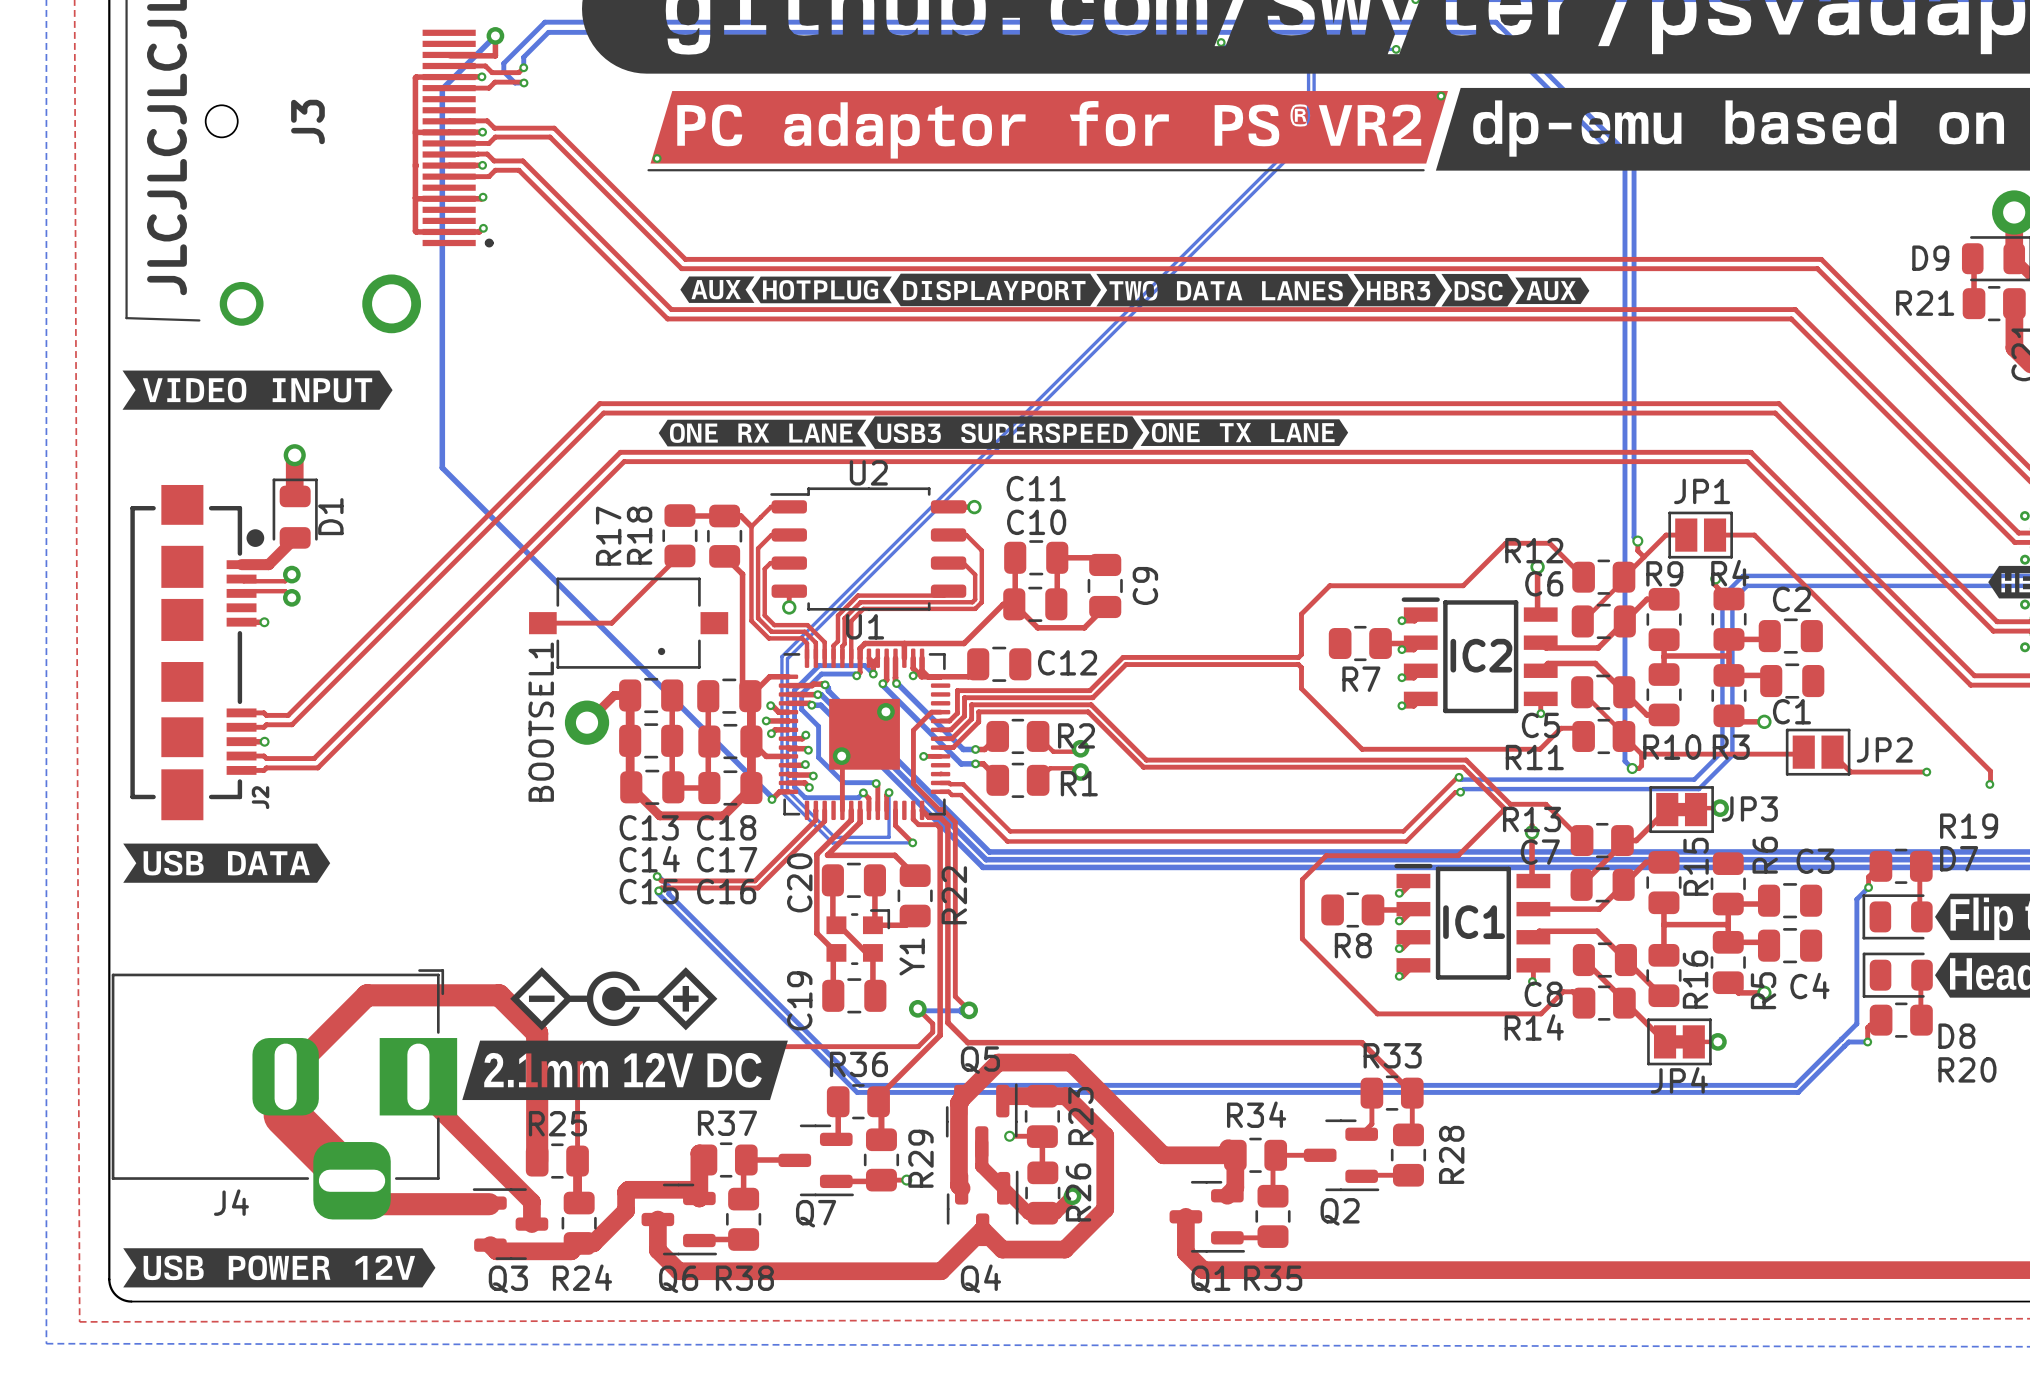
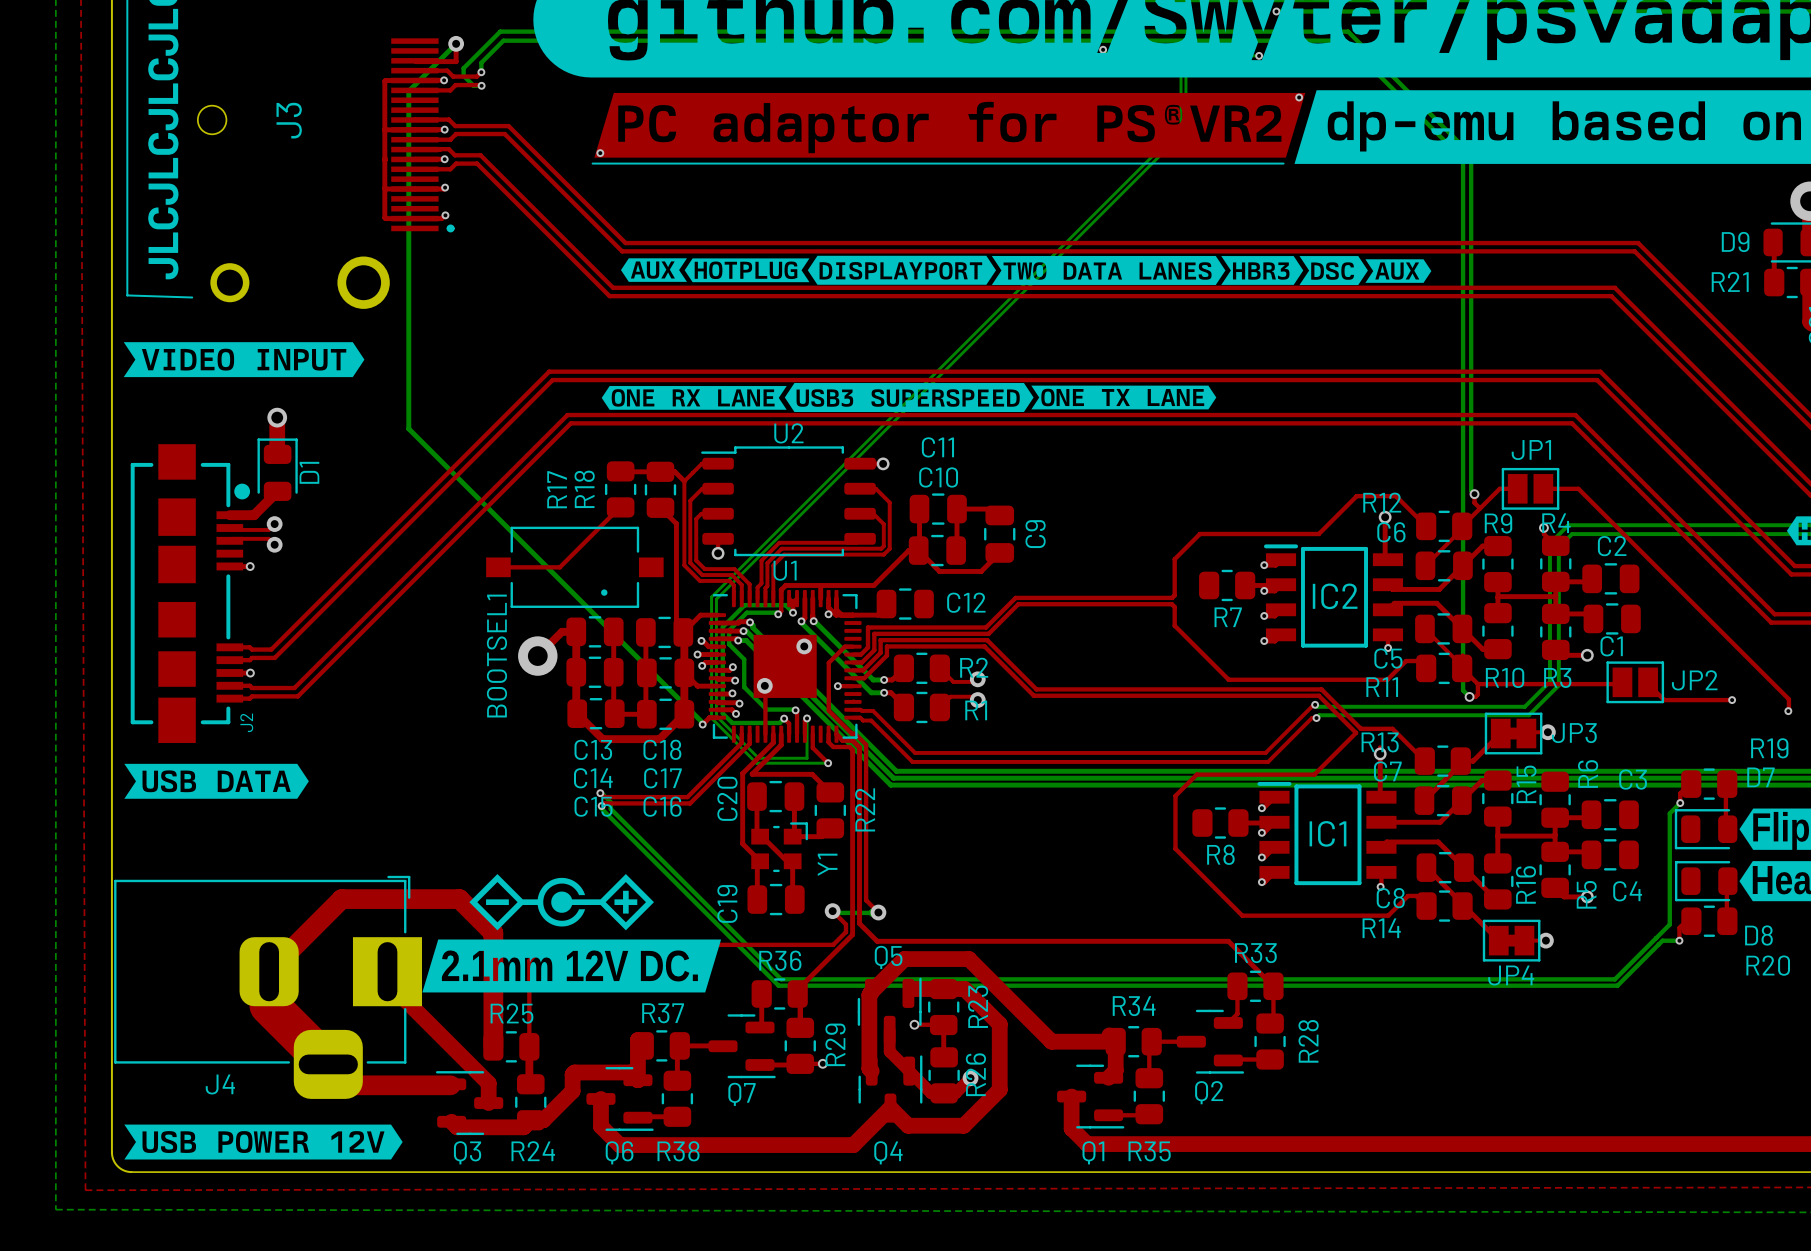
drawing shape: [462, 1040, 788, 1101] -> [422, 939, 722, 993]

